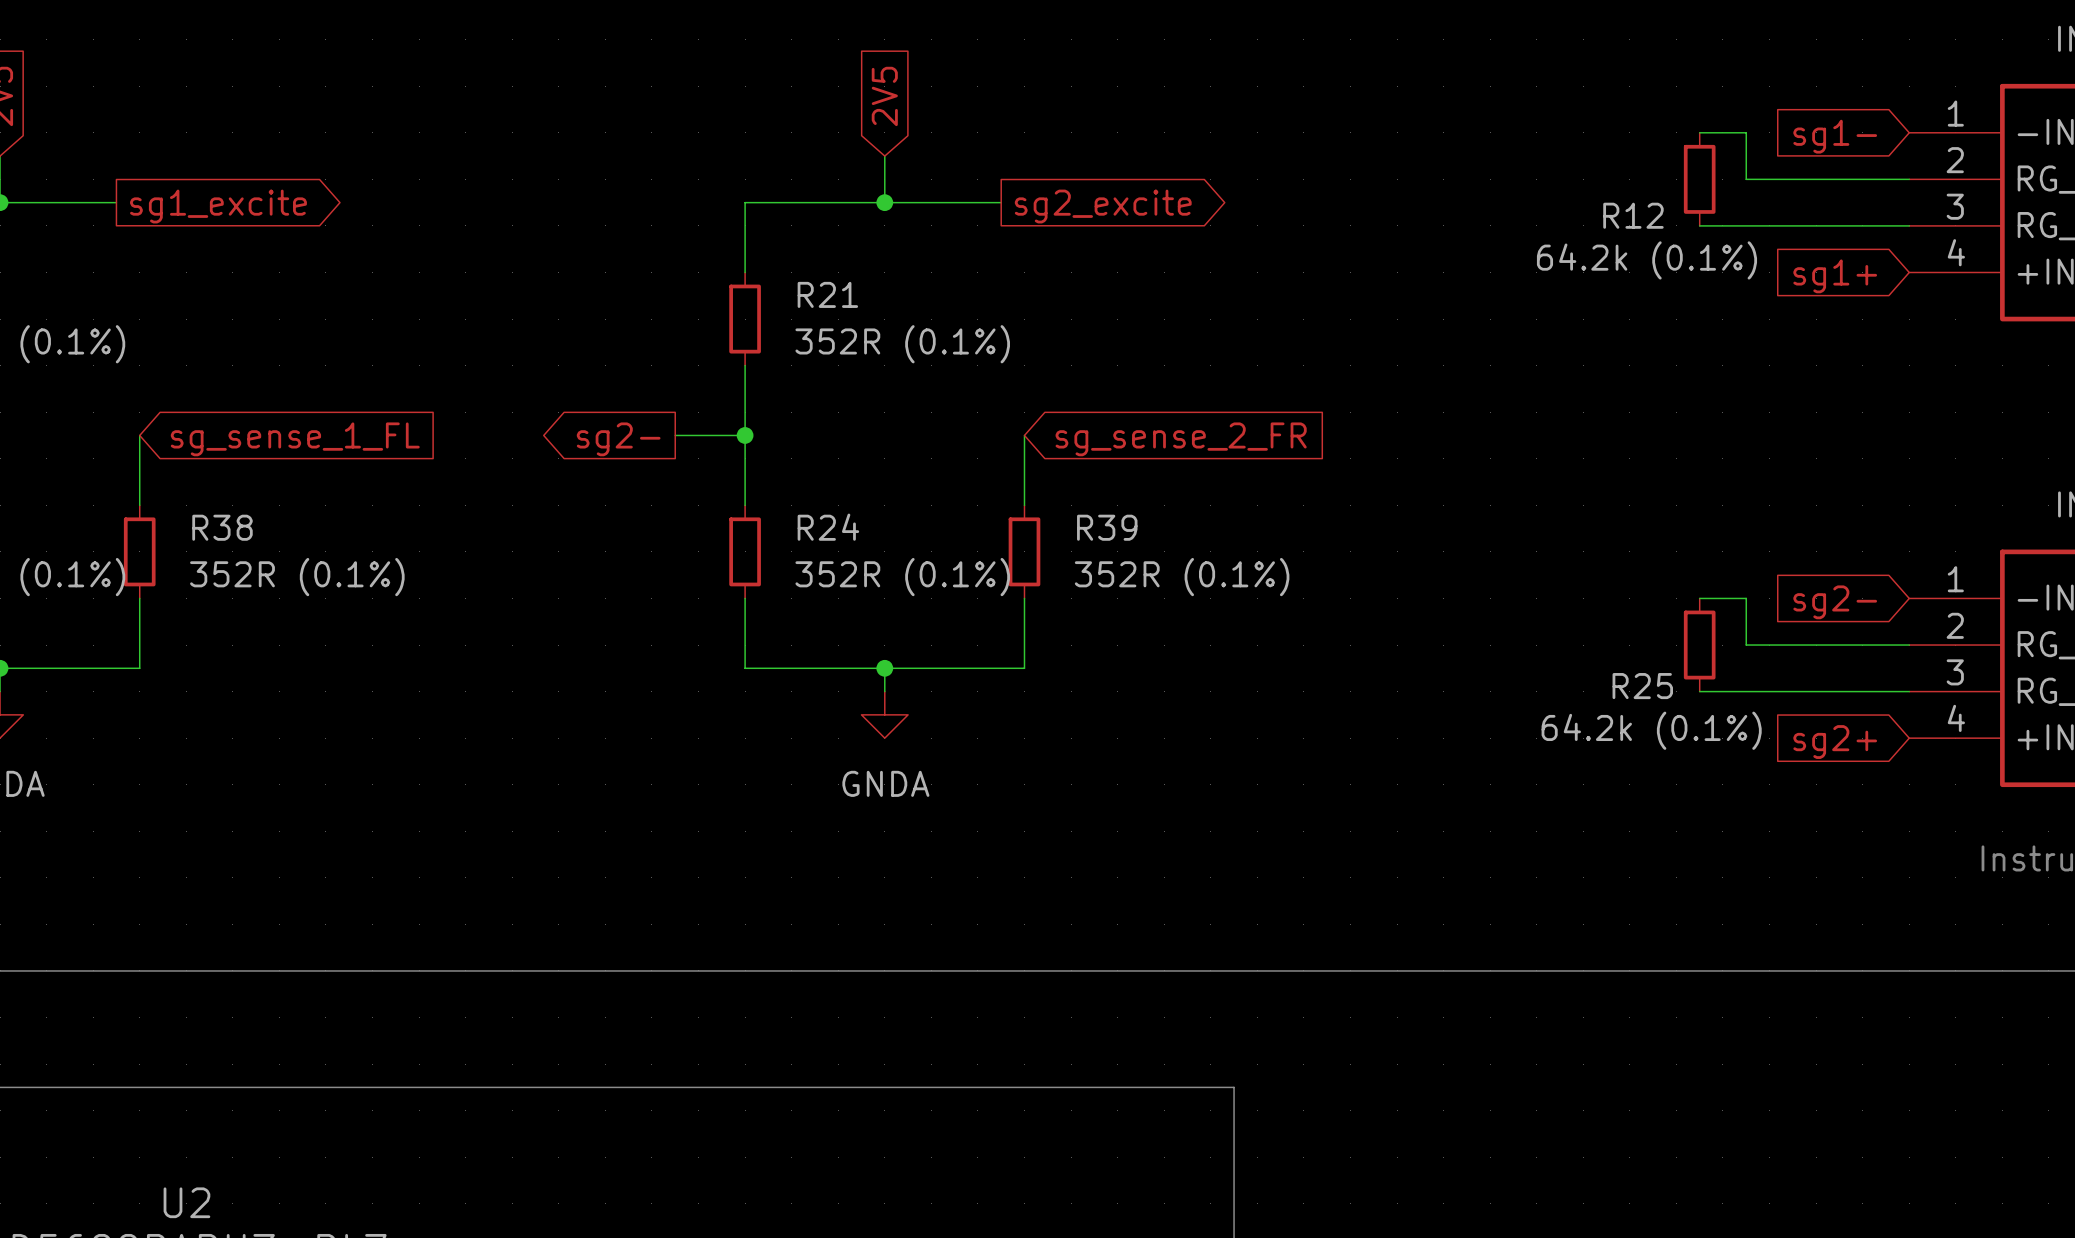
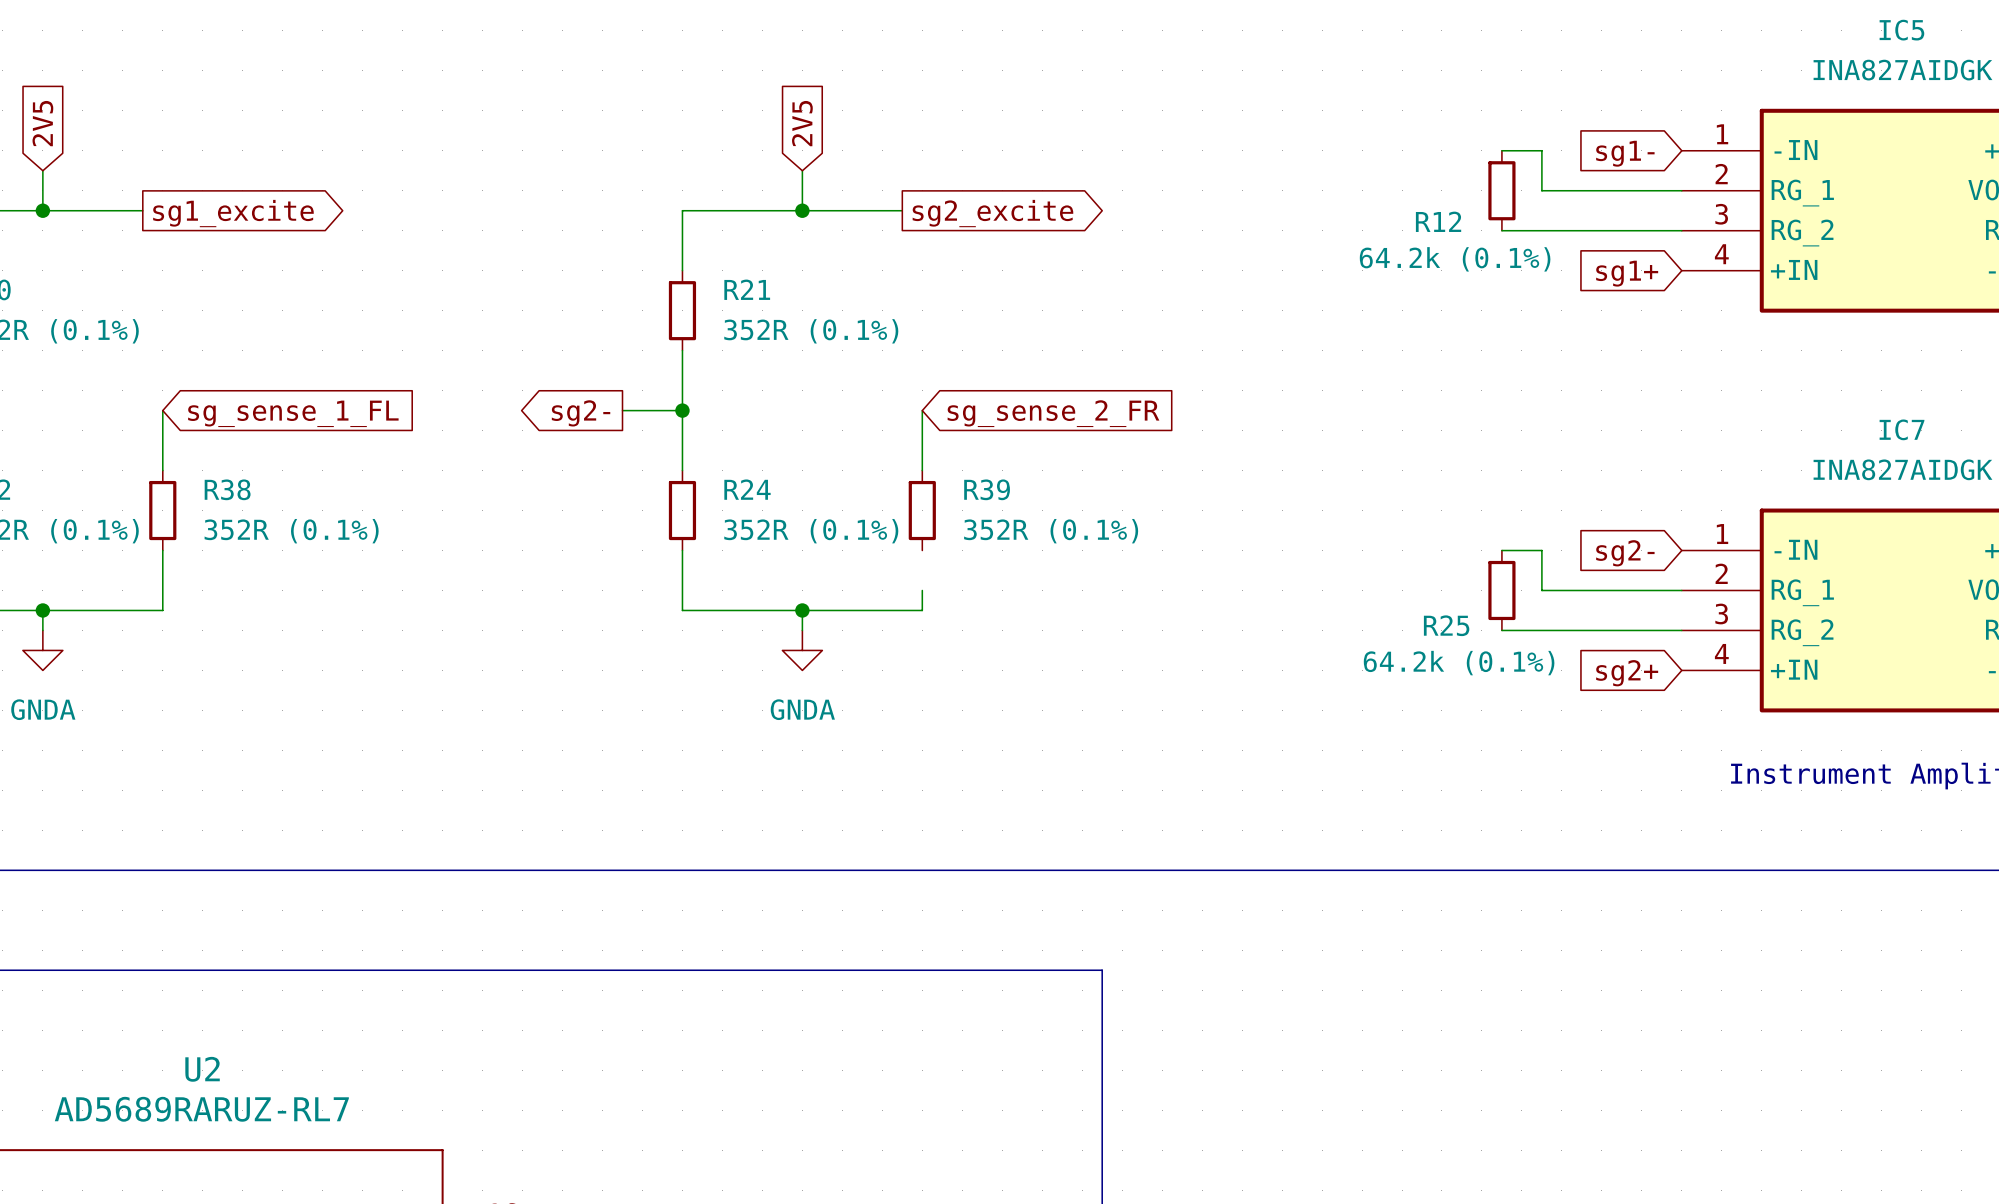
wire: (1024, 598) (1024, 645) -> none

